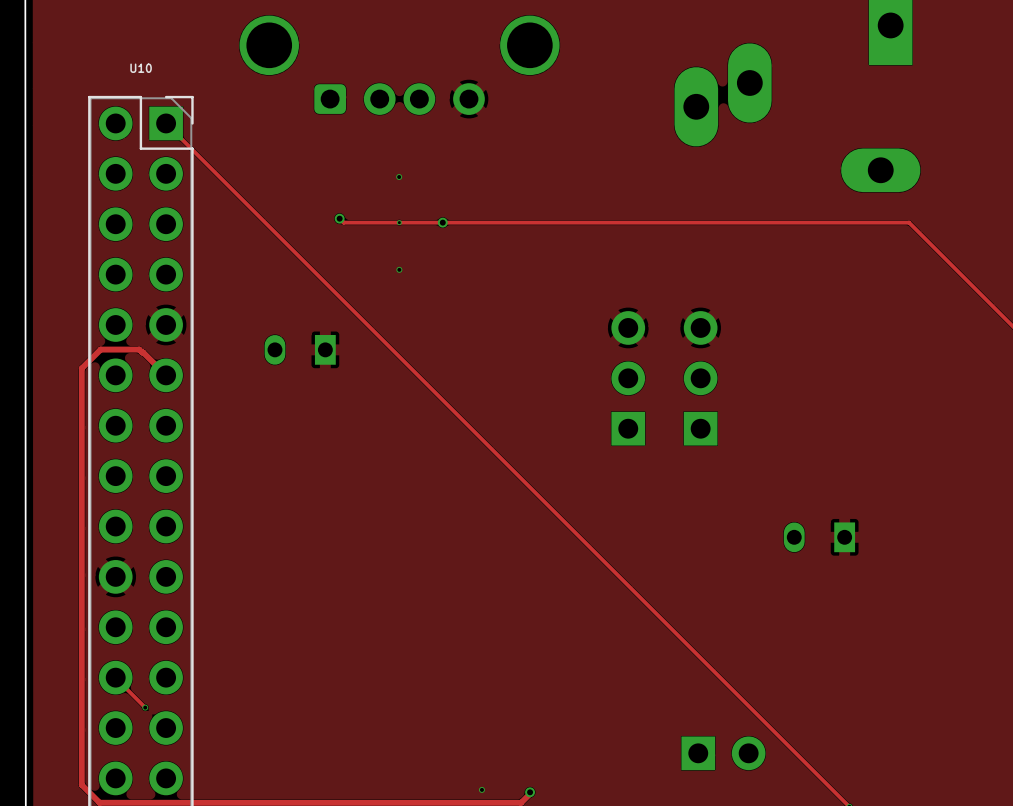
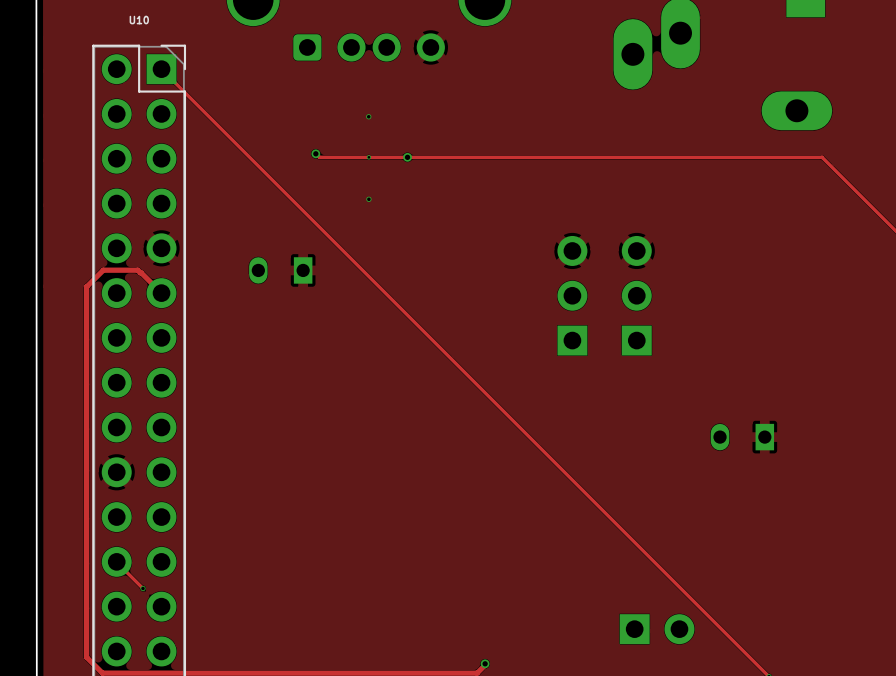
via: (481, 789) -> none

